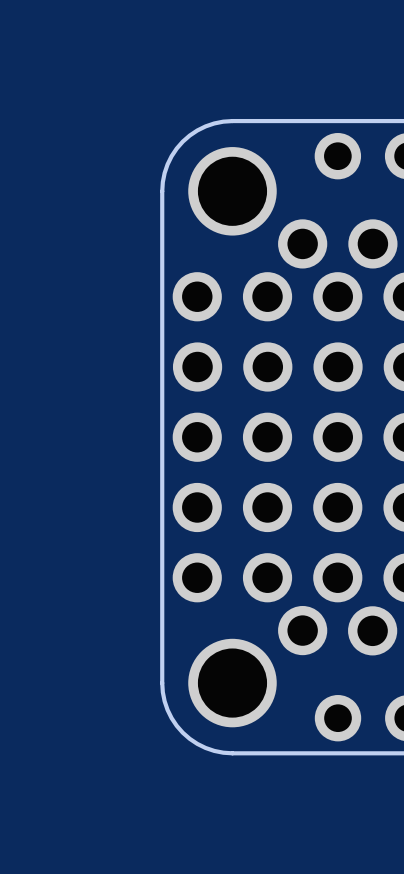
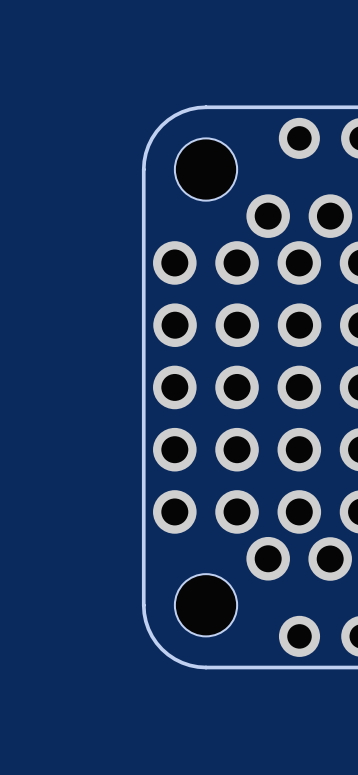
part footprint: [188, 147, 277, 236] -> [174, 138, 238, 201]
part footprint: [188, 638, 277, 728] -> [174, 574, 238, 637]

